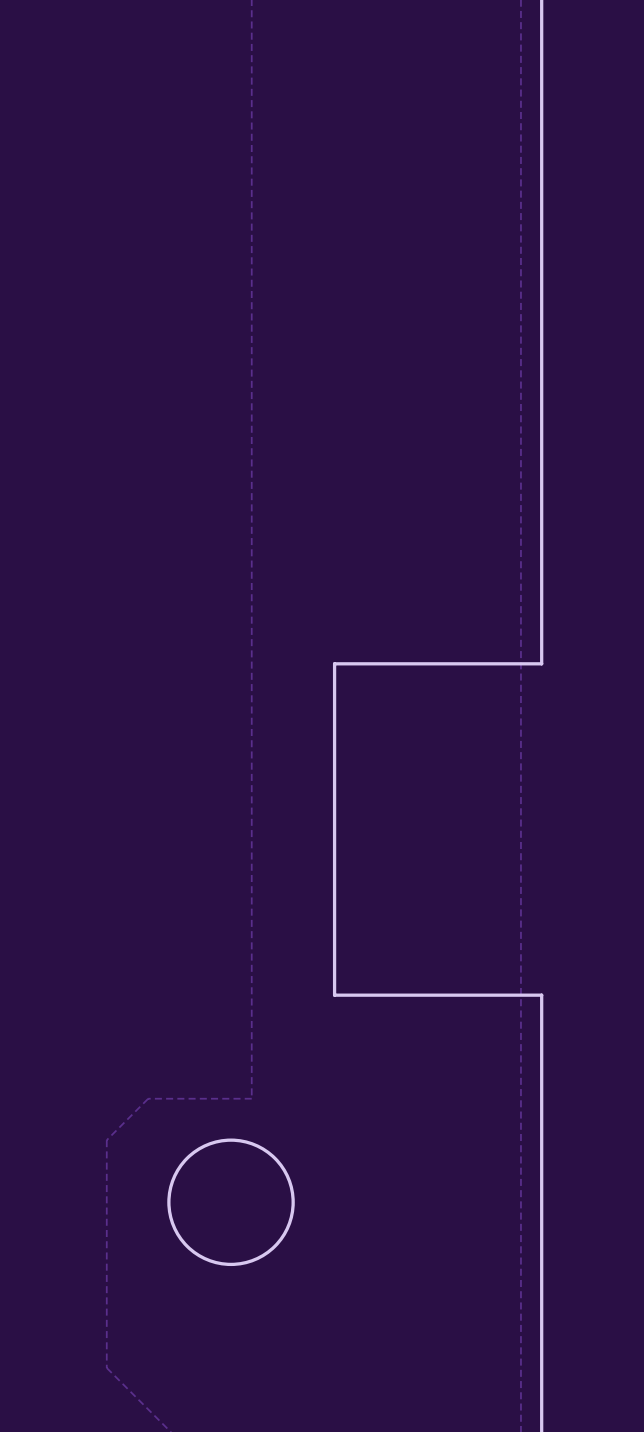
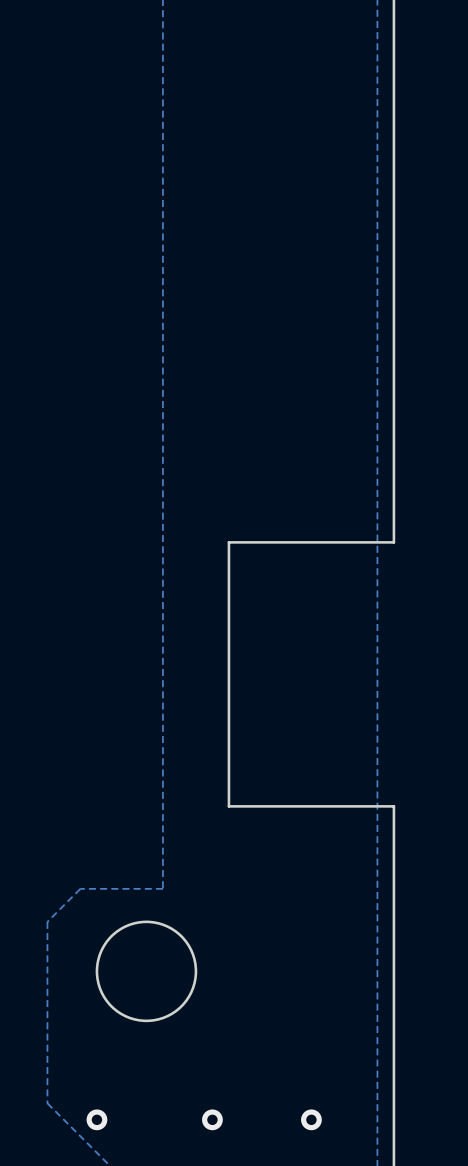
via: none -> (96, 1119)
via: none -> (212, 1119)
via: none -> (311, 1119)

